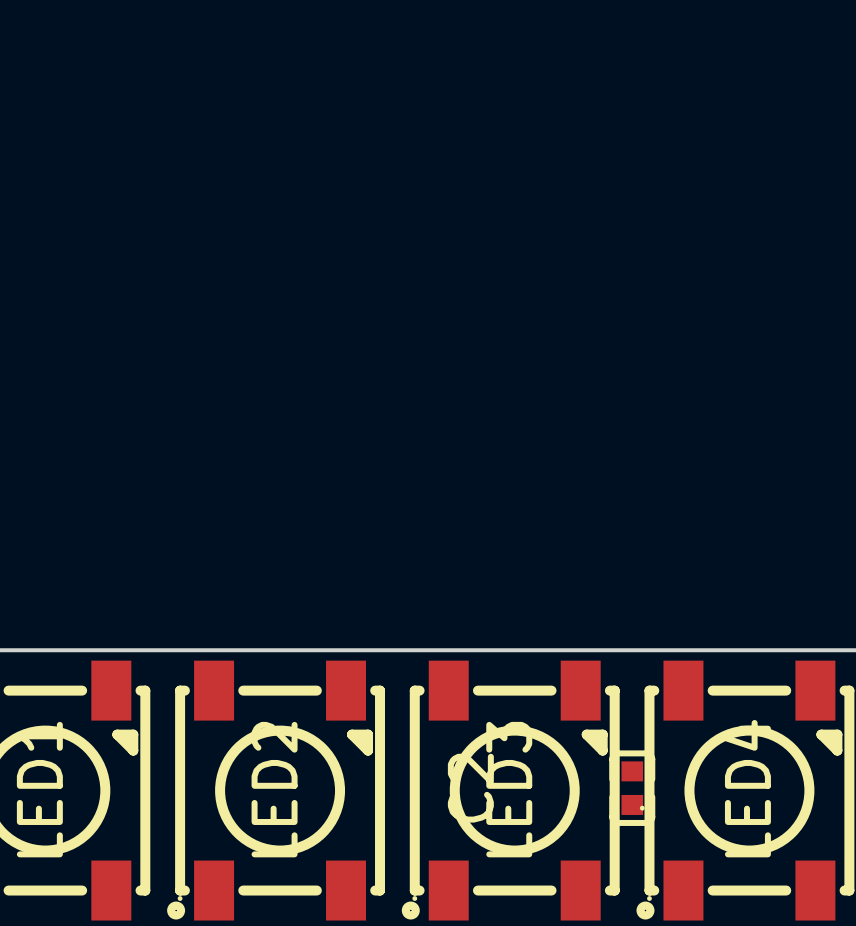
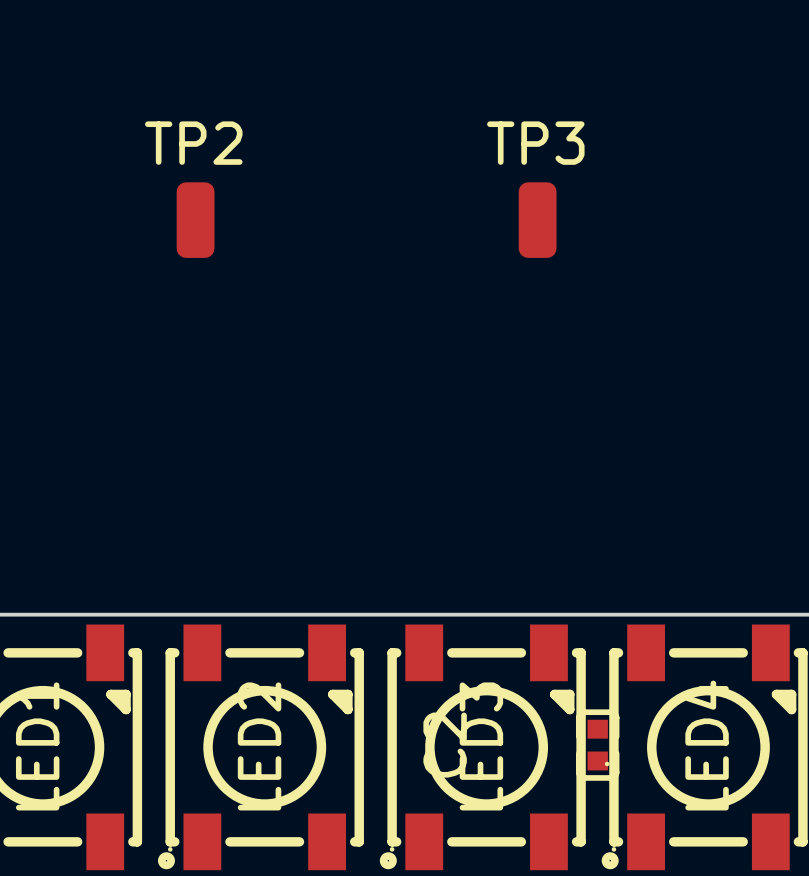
TP2: none -> (195, 220)
TP3: none -> (537, 220)

